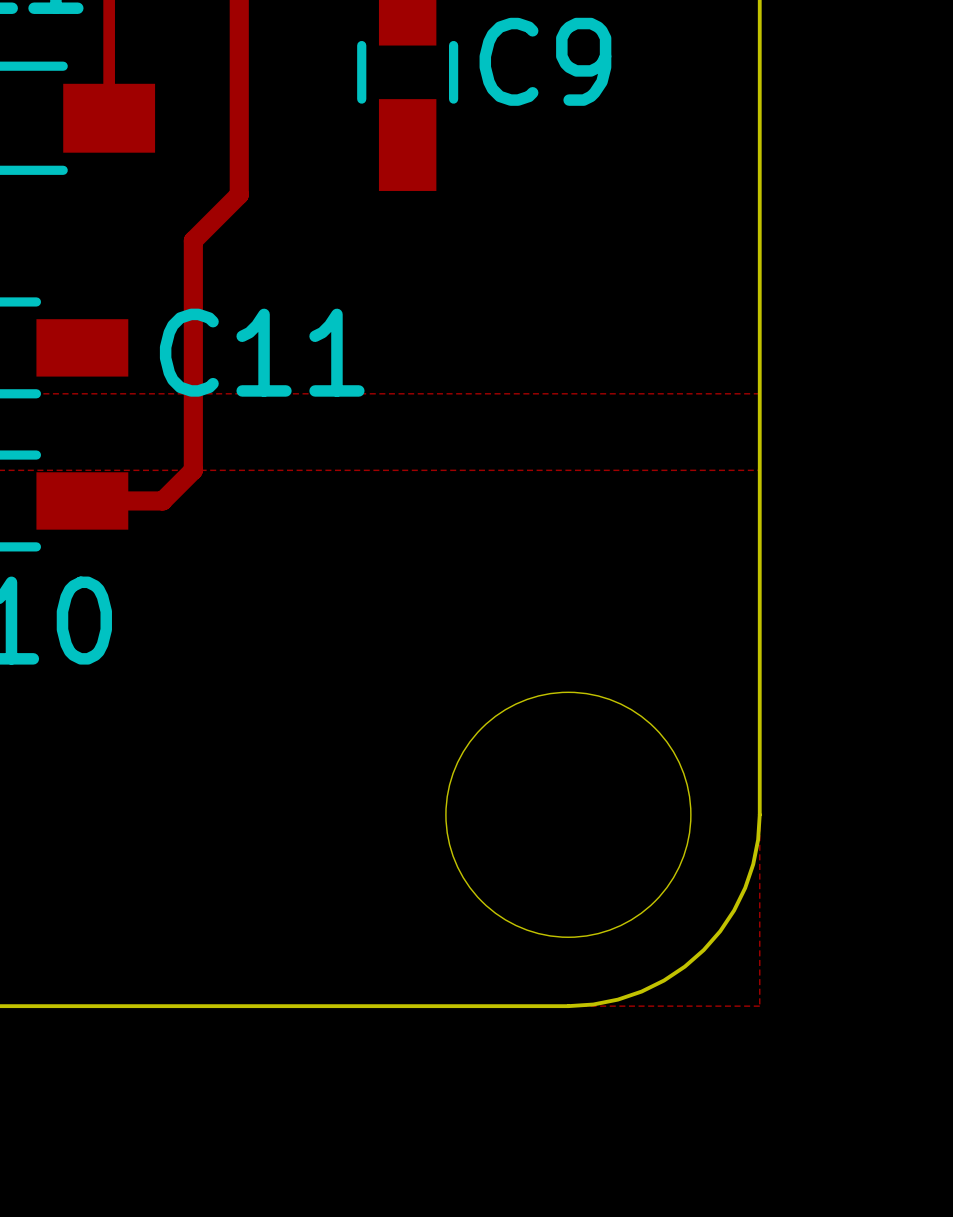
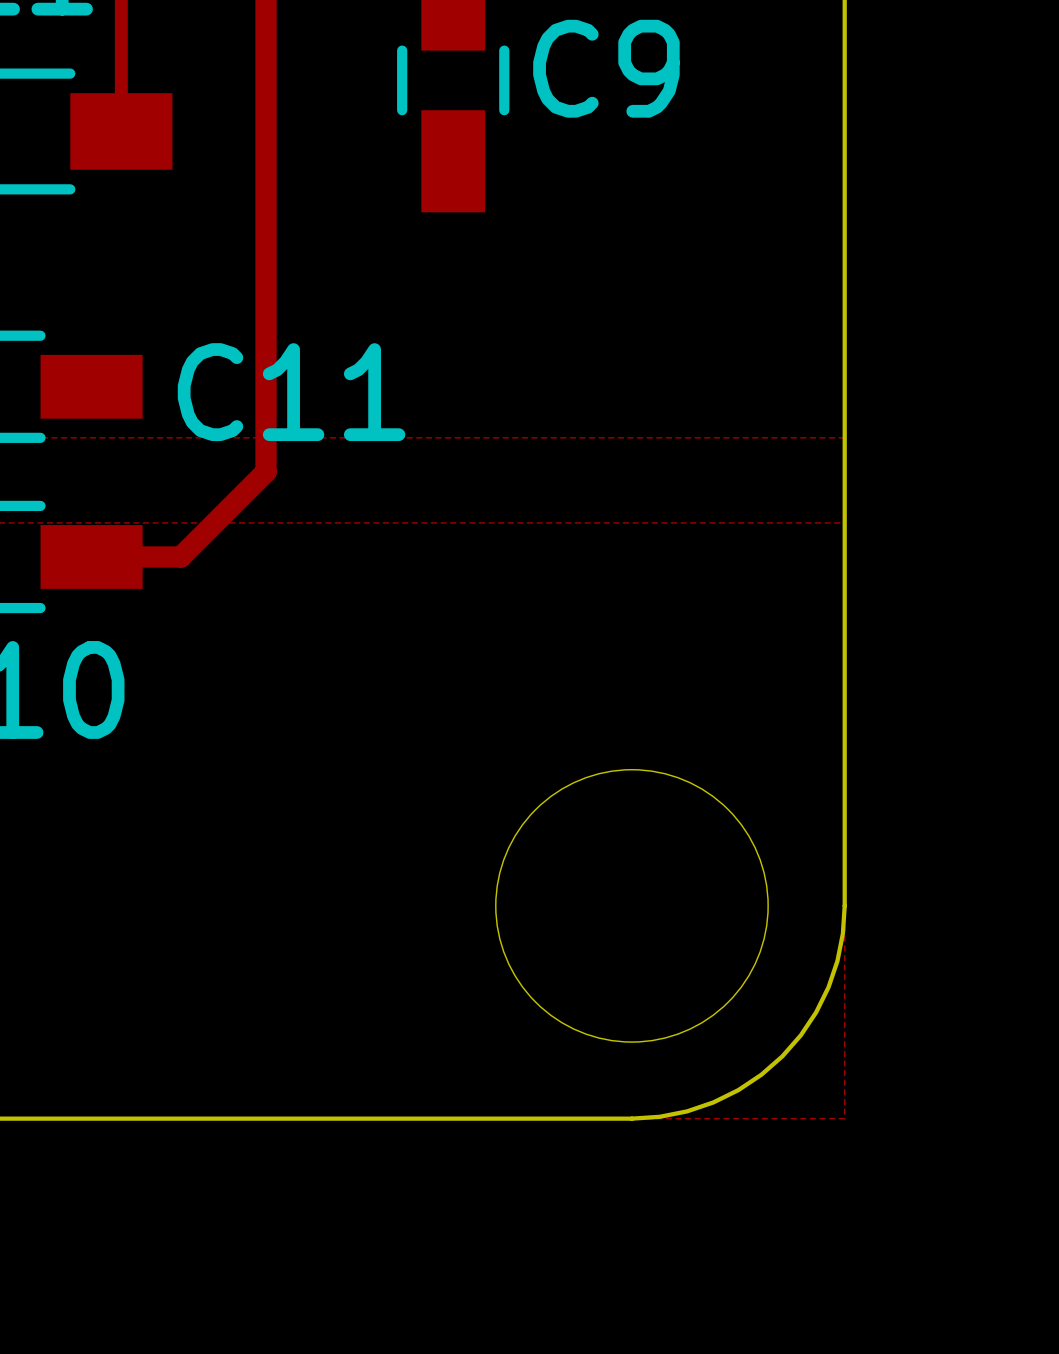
track: (239, 194) (193, 240) (193, 470) -> (266, 216) (266, 471) (214, 522)

